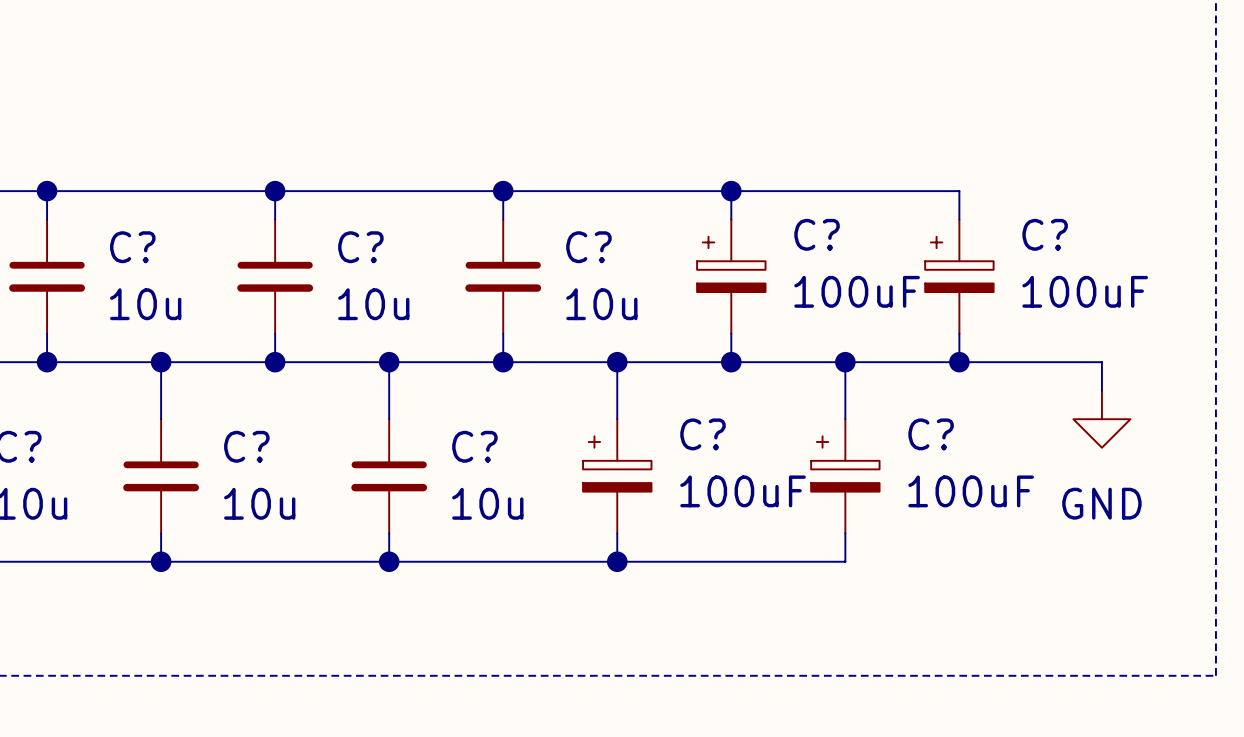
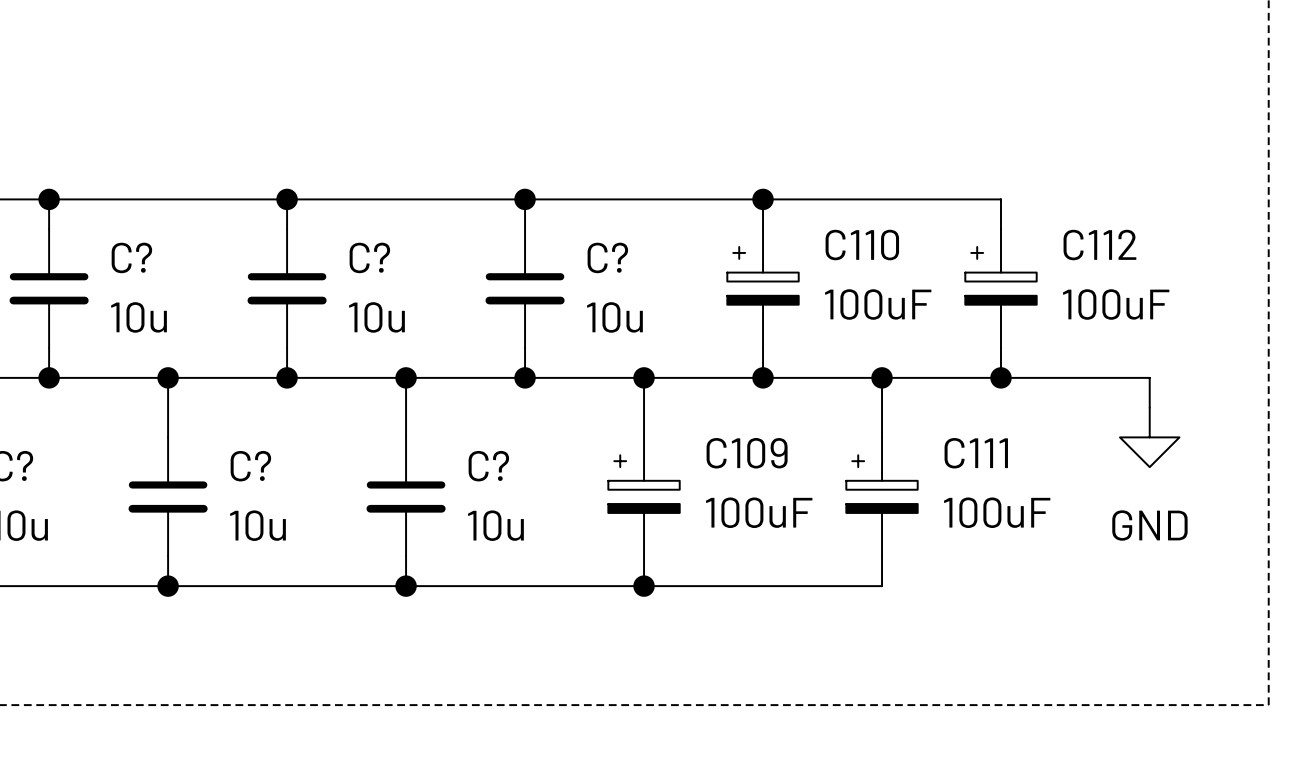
C? name: C? (817, 234) -> C110 (862, 245)
C? name: C? (1045, 234) -> C112 (1099, 245)
C? name: C? (703, 434) -> C109 (747, 453)
C? name: C? (931, 434) -> C111 (976, 453)

